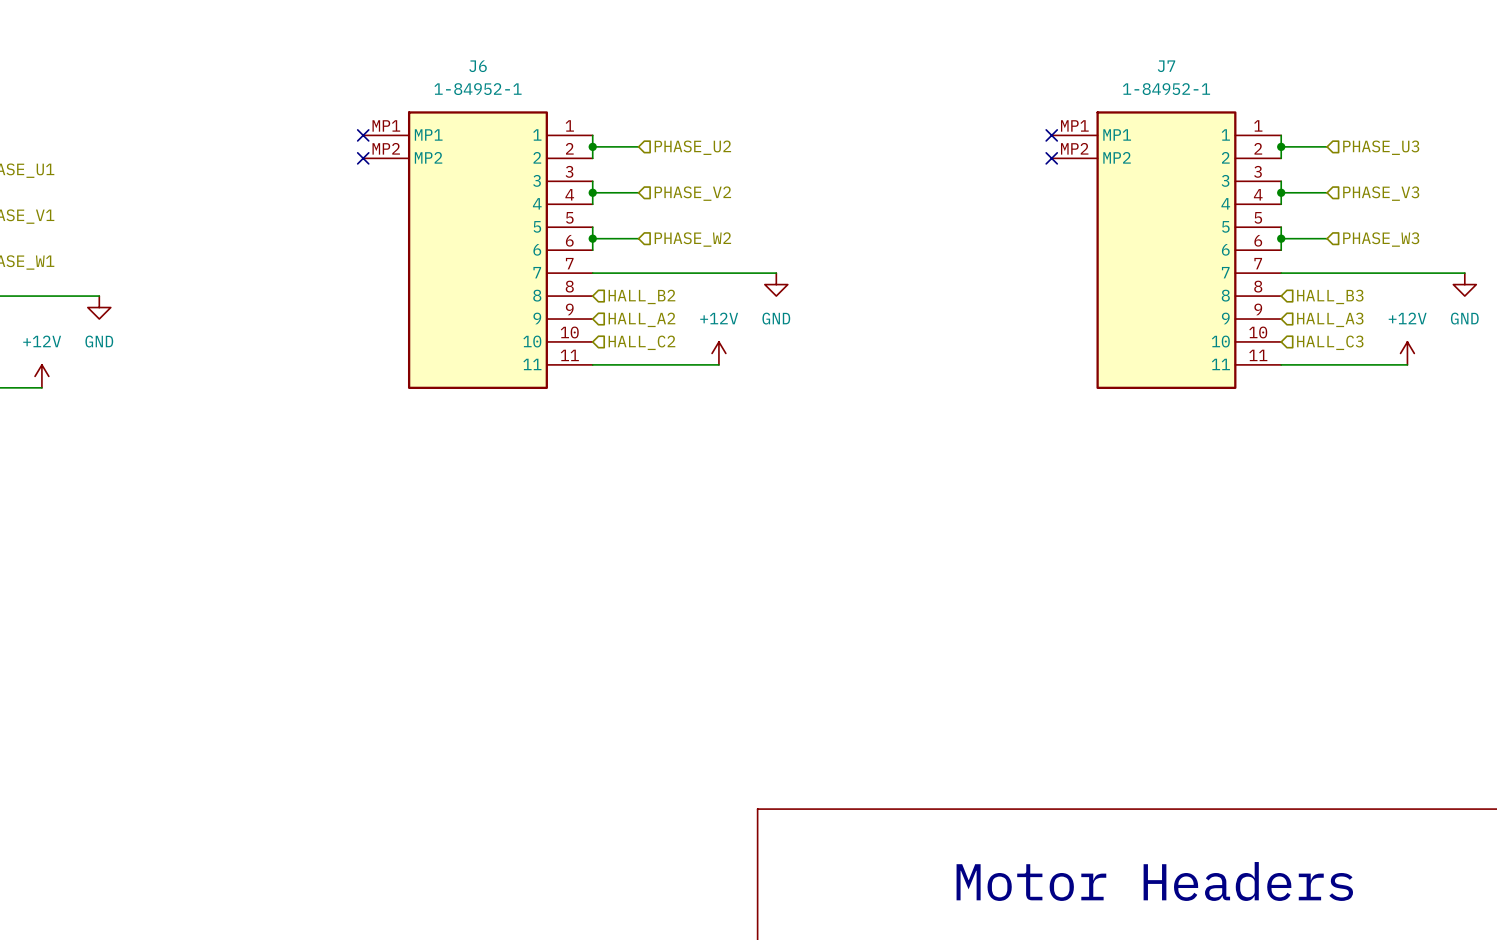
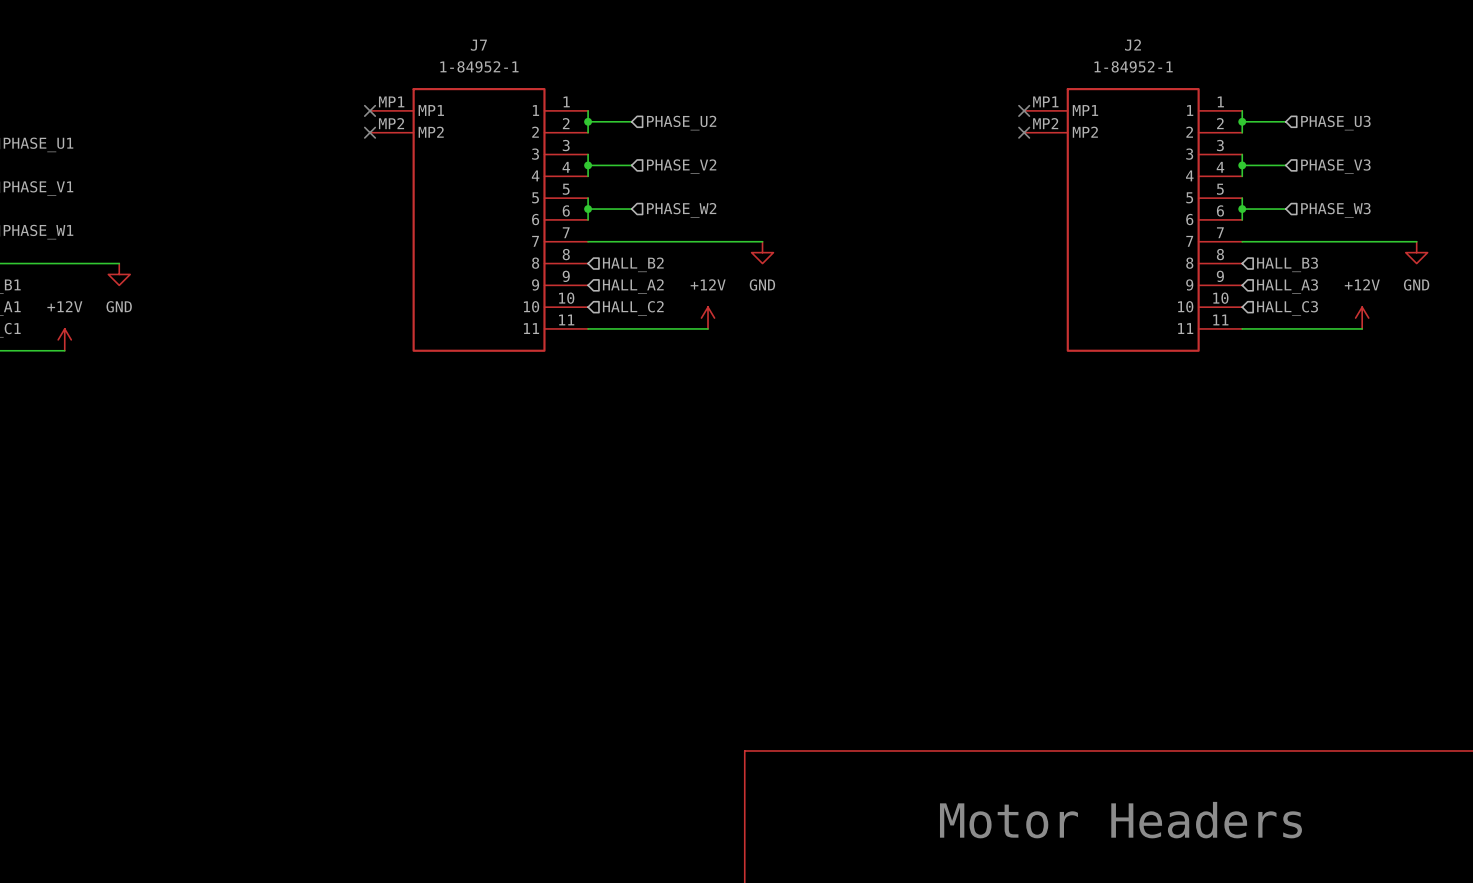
J6 name: J6 (478, 66) -> J7 (478, 45)
J7 name: J7 (1166, 66) -> J2 (1132, 45)

